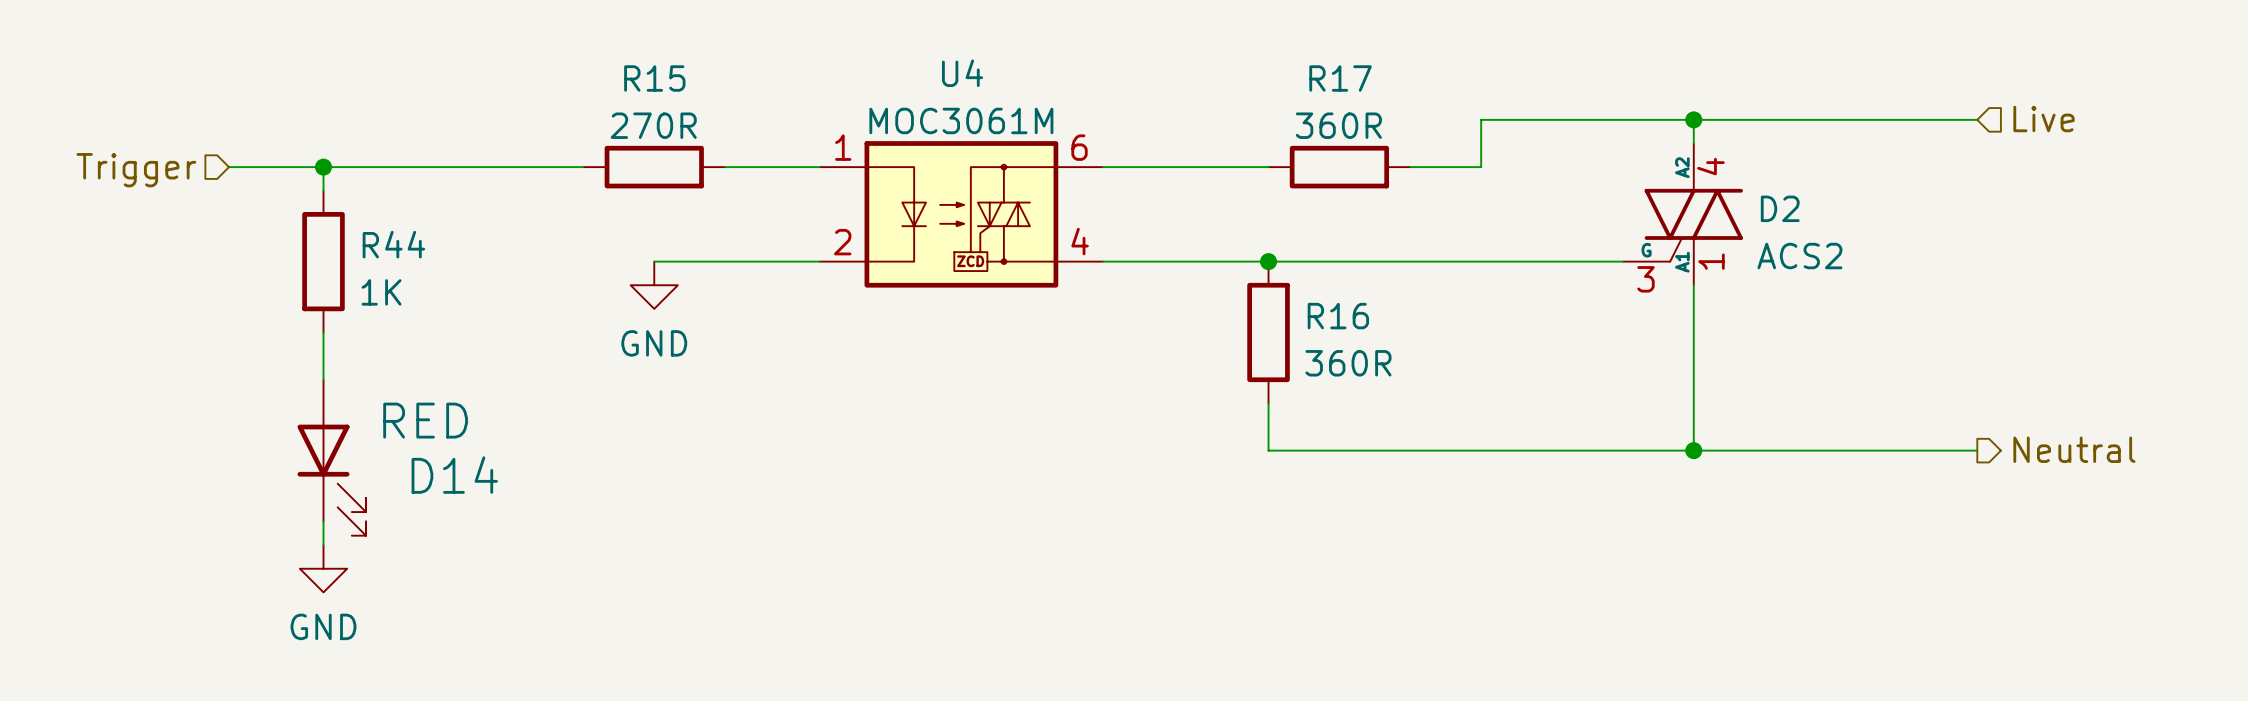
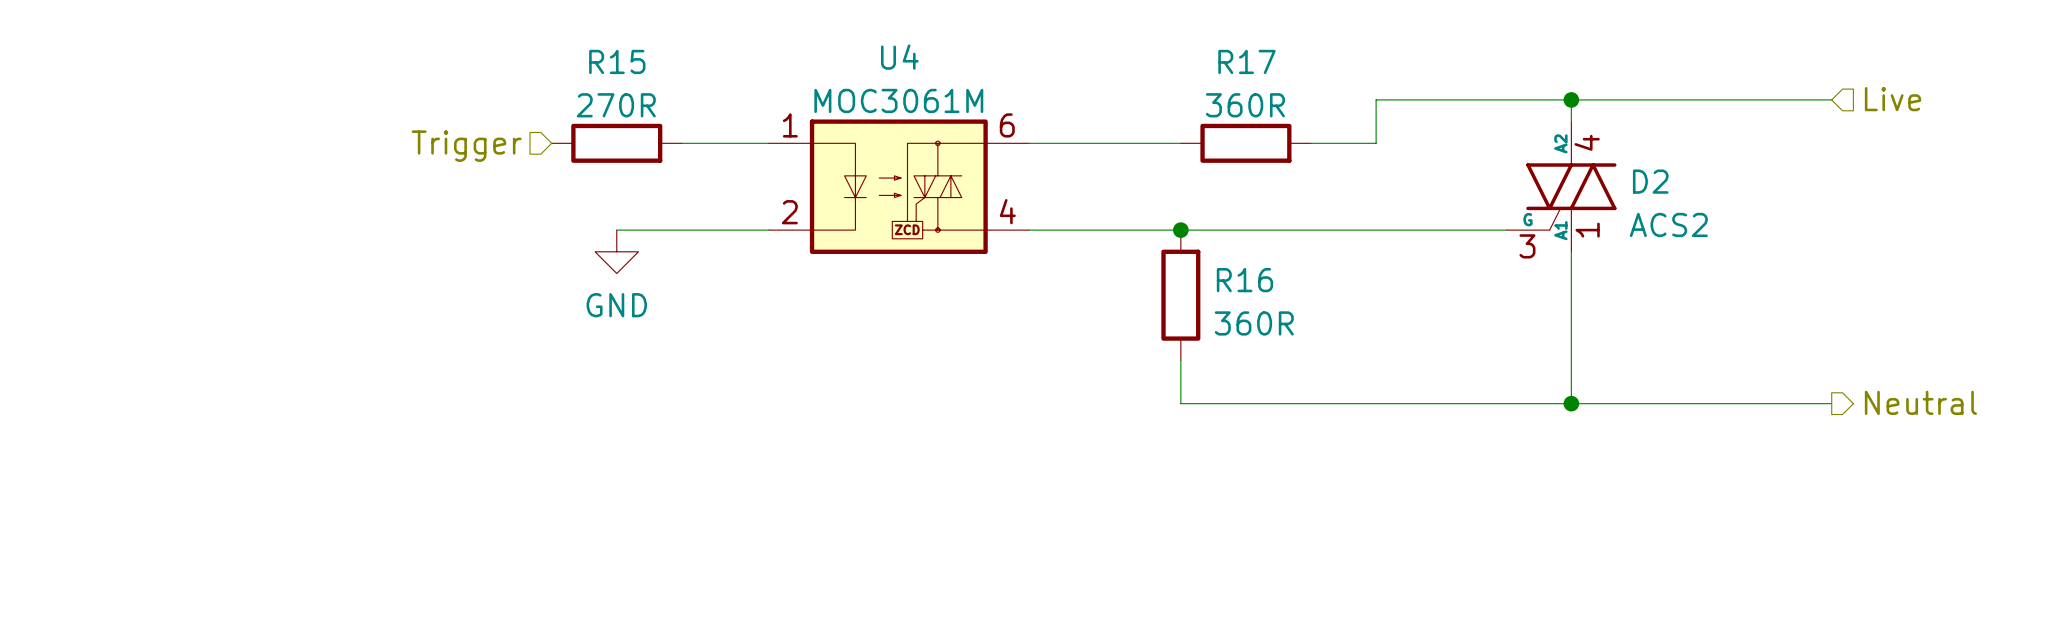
wire: (229, 167) (583, 167) -> none
wire: (323, 167) (323, 190) -> none
junction: (323, 167) -> none
hierarchical label position: Trigger (136, 170) -> Trigger (466, 146)
R44: 1K (323, 261) -> none
wire: (323, 332) (323, 379) -> none
D14: RED (331, 457) -> none
wire: (323, 521) (323, 545) -> none
power symbol: GND (323, 568) -> none

